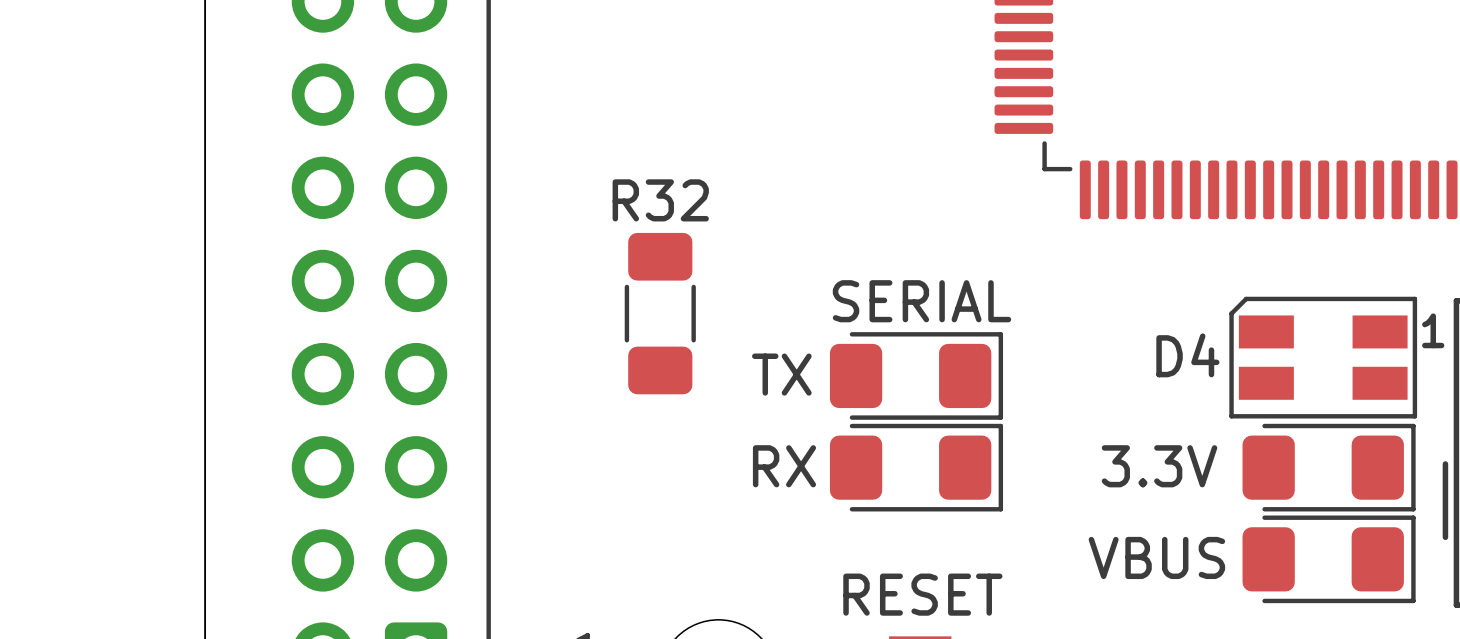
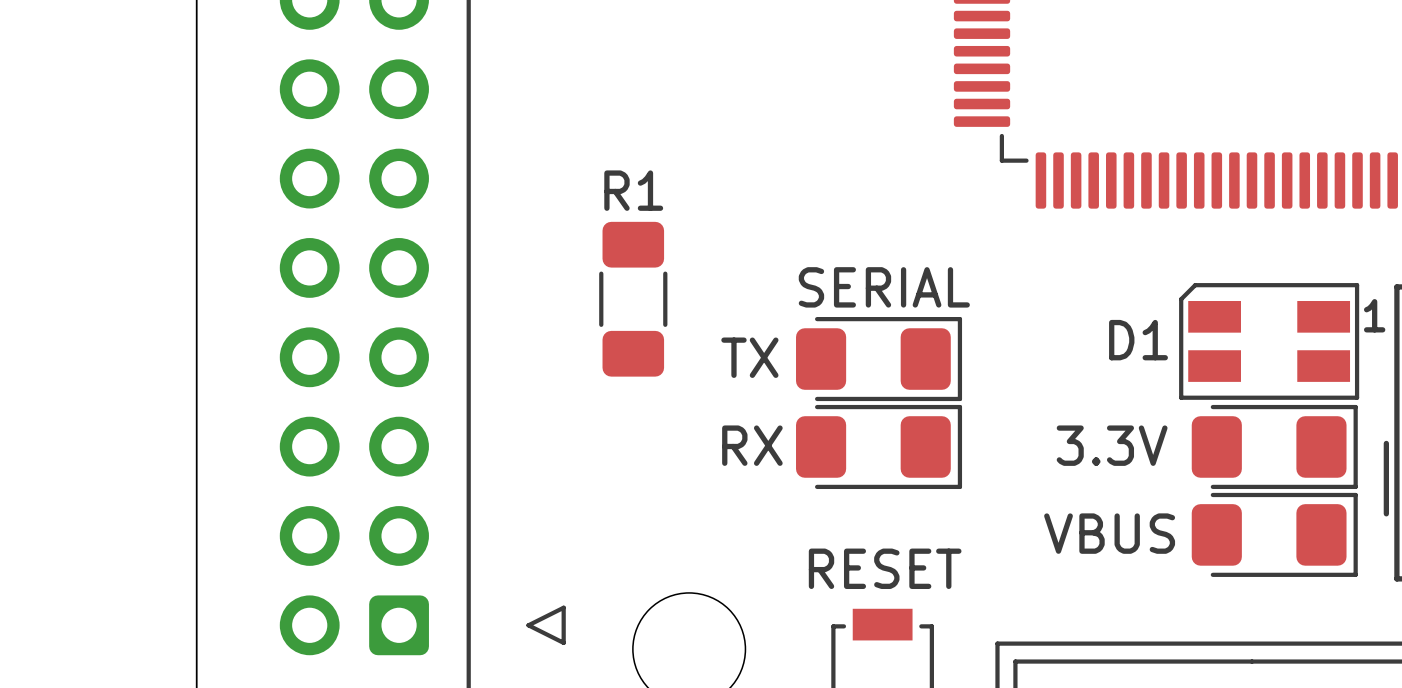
R32 name: R32 (660, 200) -> R1 (633, 190)
D4 name: D4 (1187, 355) -> D1 (1138, 340)

